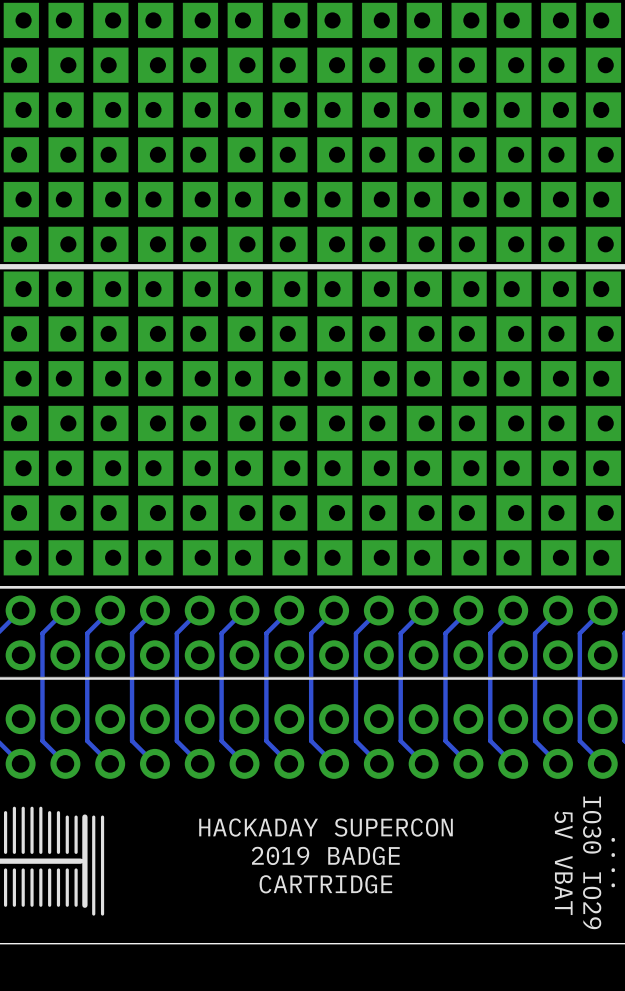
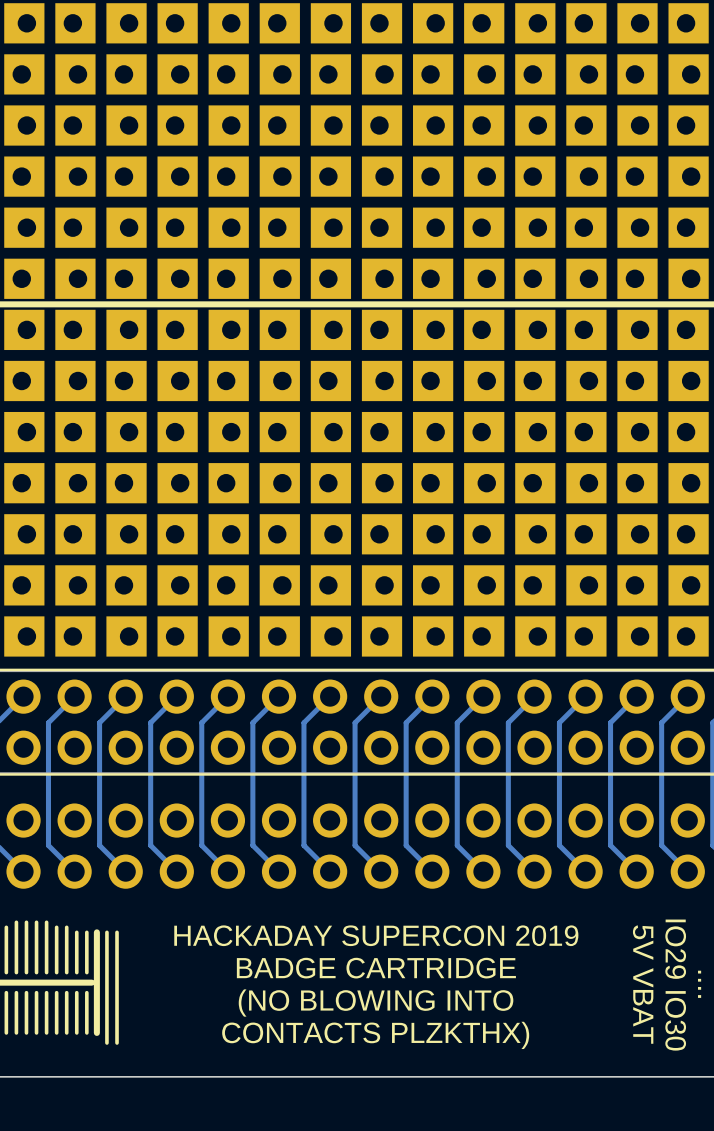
text: HACKADAY SUPERCON (326, 827) -> HACKADAY SUPERCON 2019 (376, 935)
text: 2019 BADGE (325, 855) -> BADGE CARTRIDGE (376, 968)
text: IO30 IO29 (592, 862) -> IO29 IO30 (675, 985)
text: CARTRIDGE (325, 884) -> (NO BLOWING INTO (376, 1003)
text: none -> CONTACTS PLZKTHX) (375, 1035)

